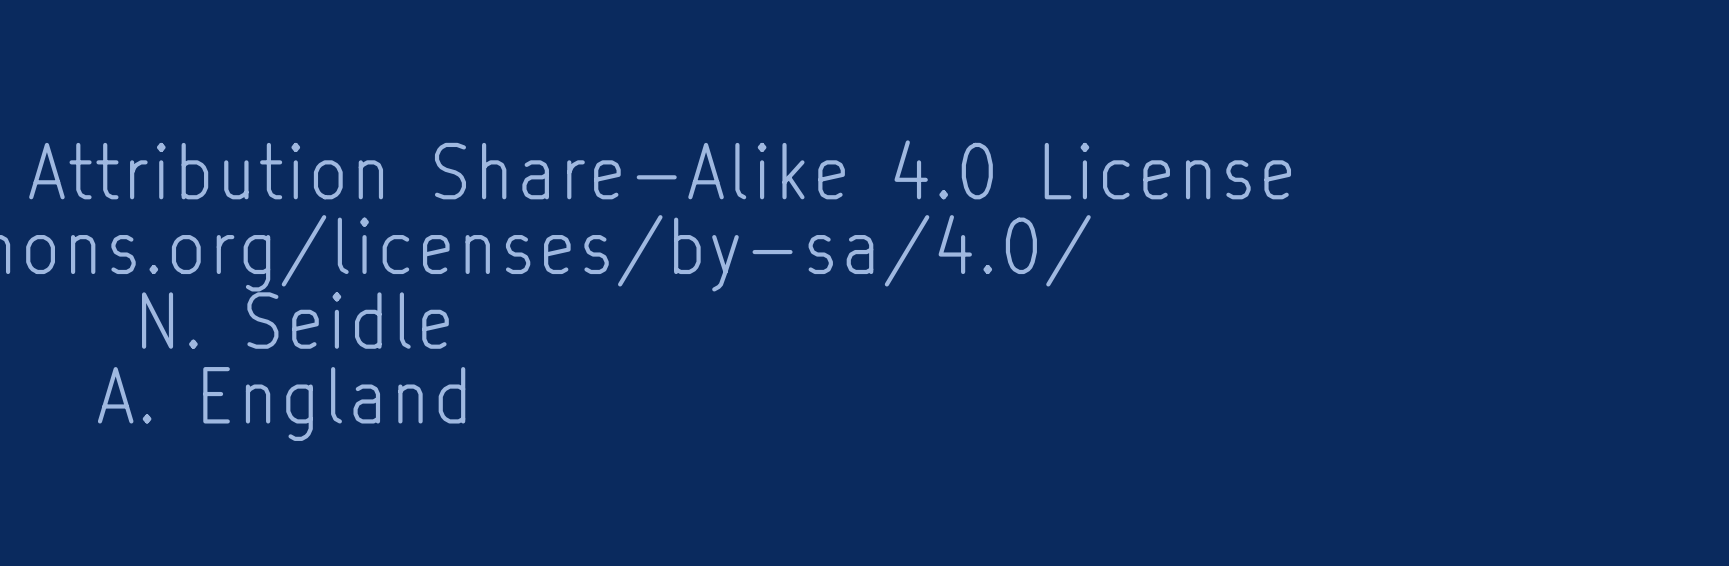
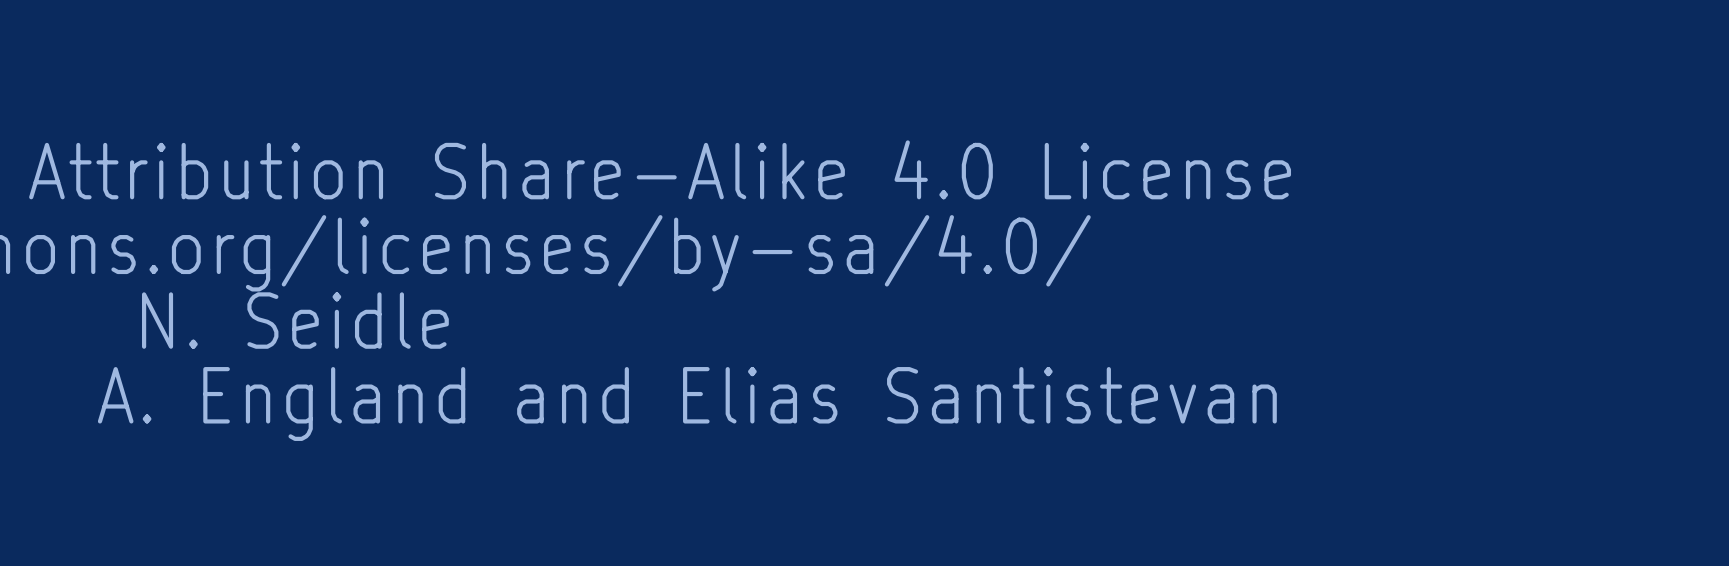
text: A. England (281, 403) -> A. England and Elias Santistevan (687, 403)

